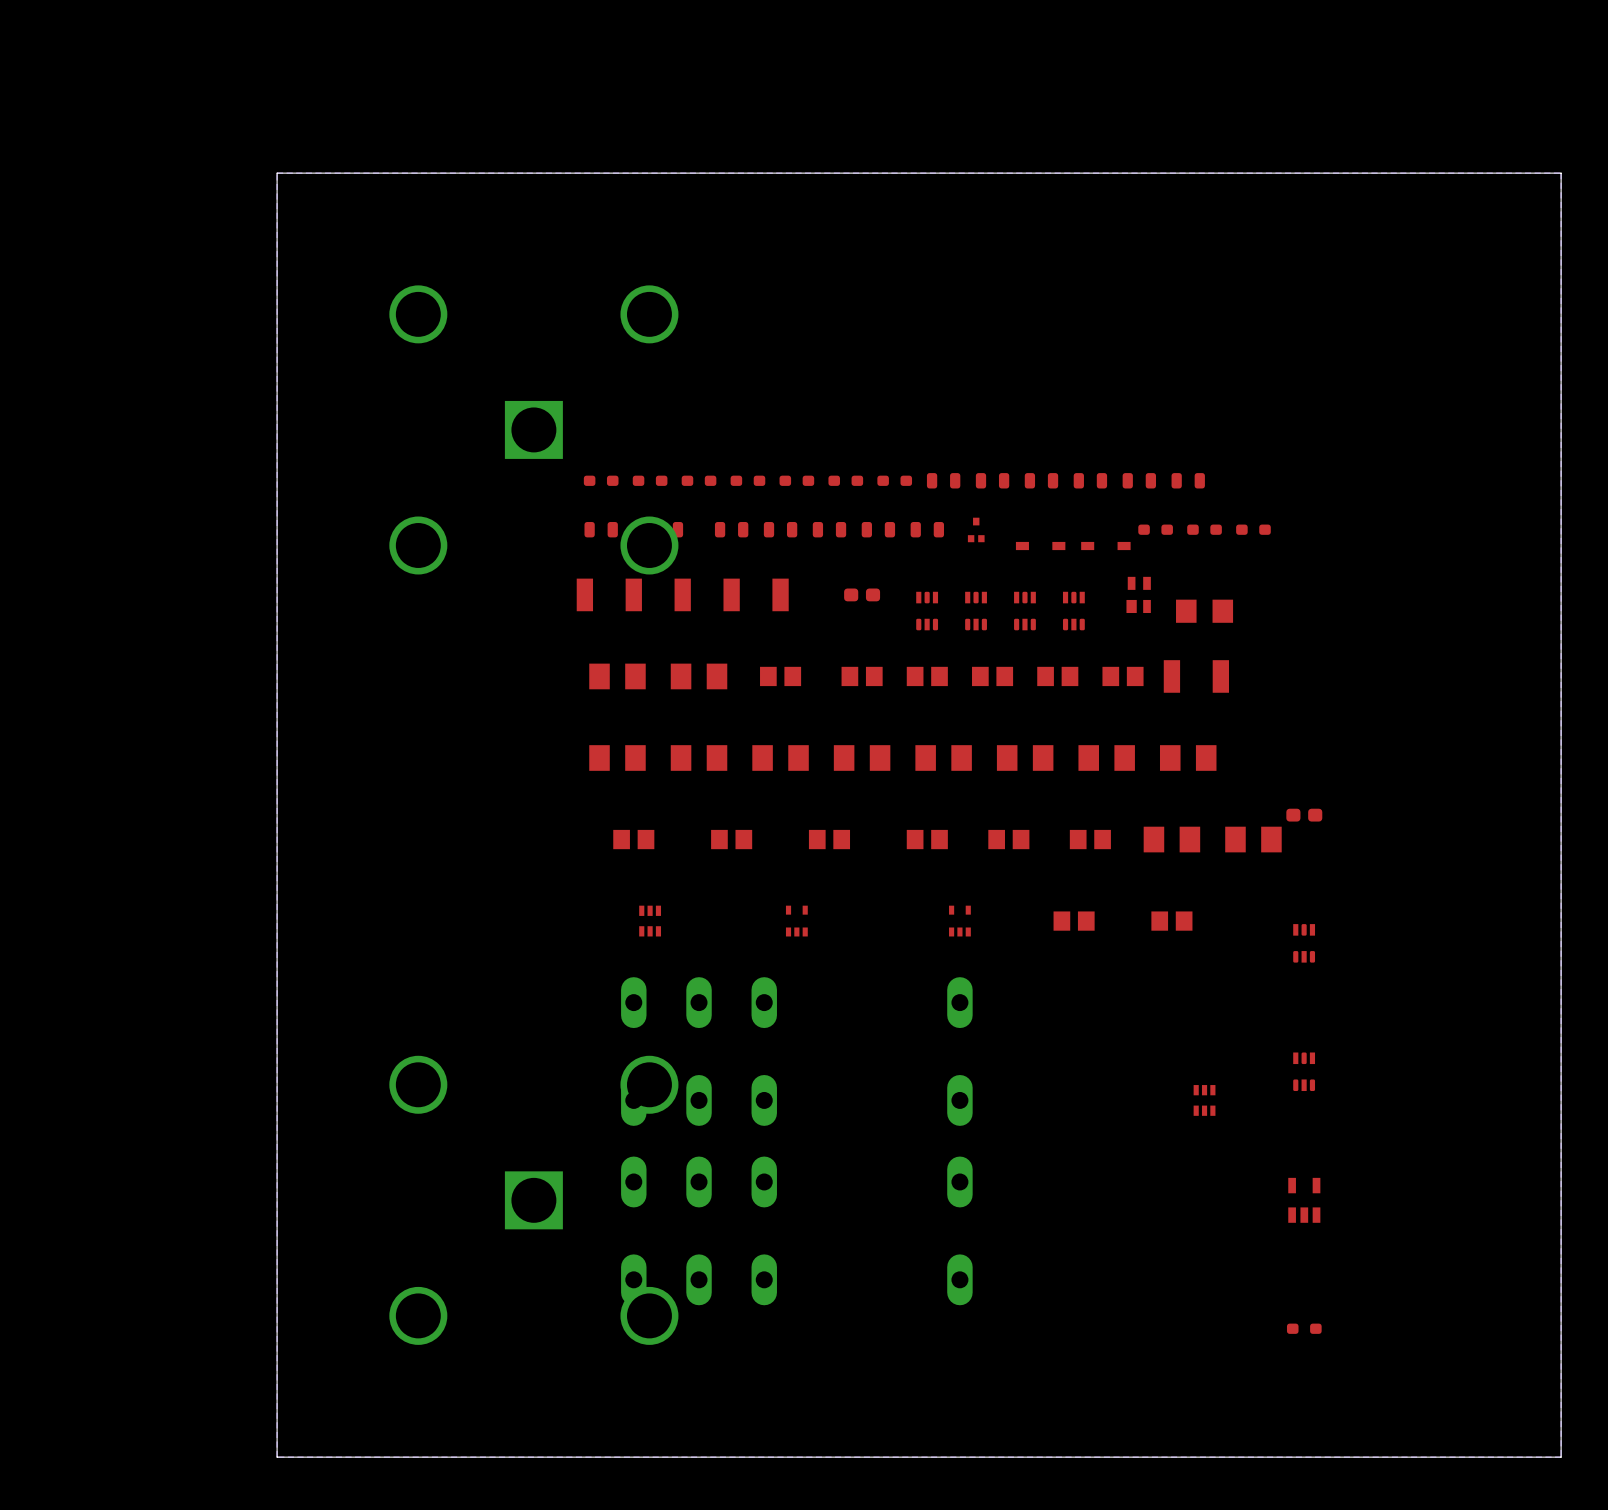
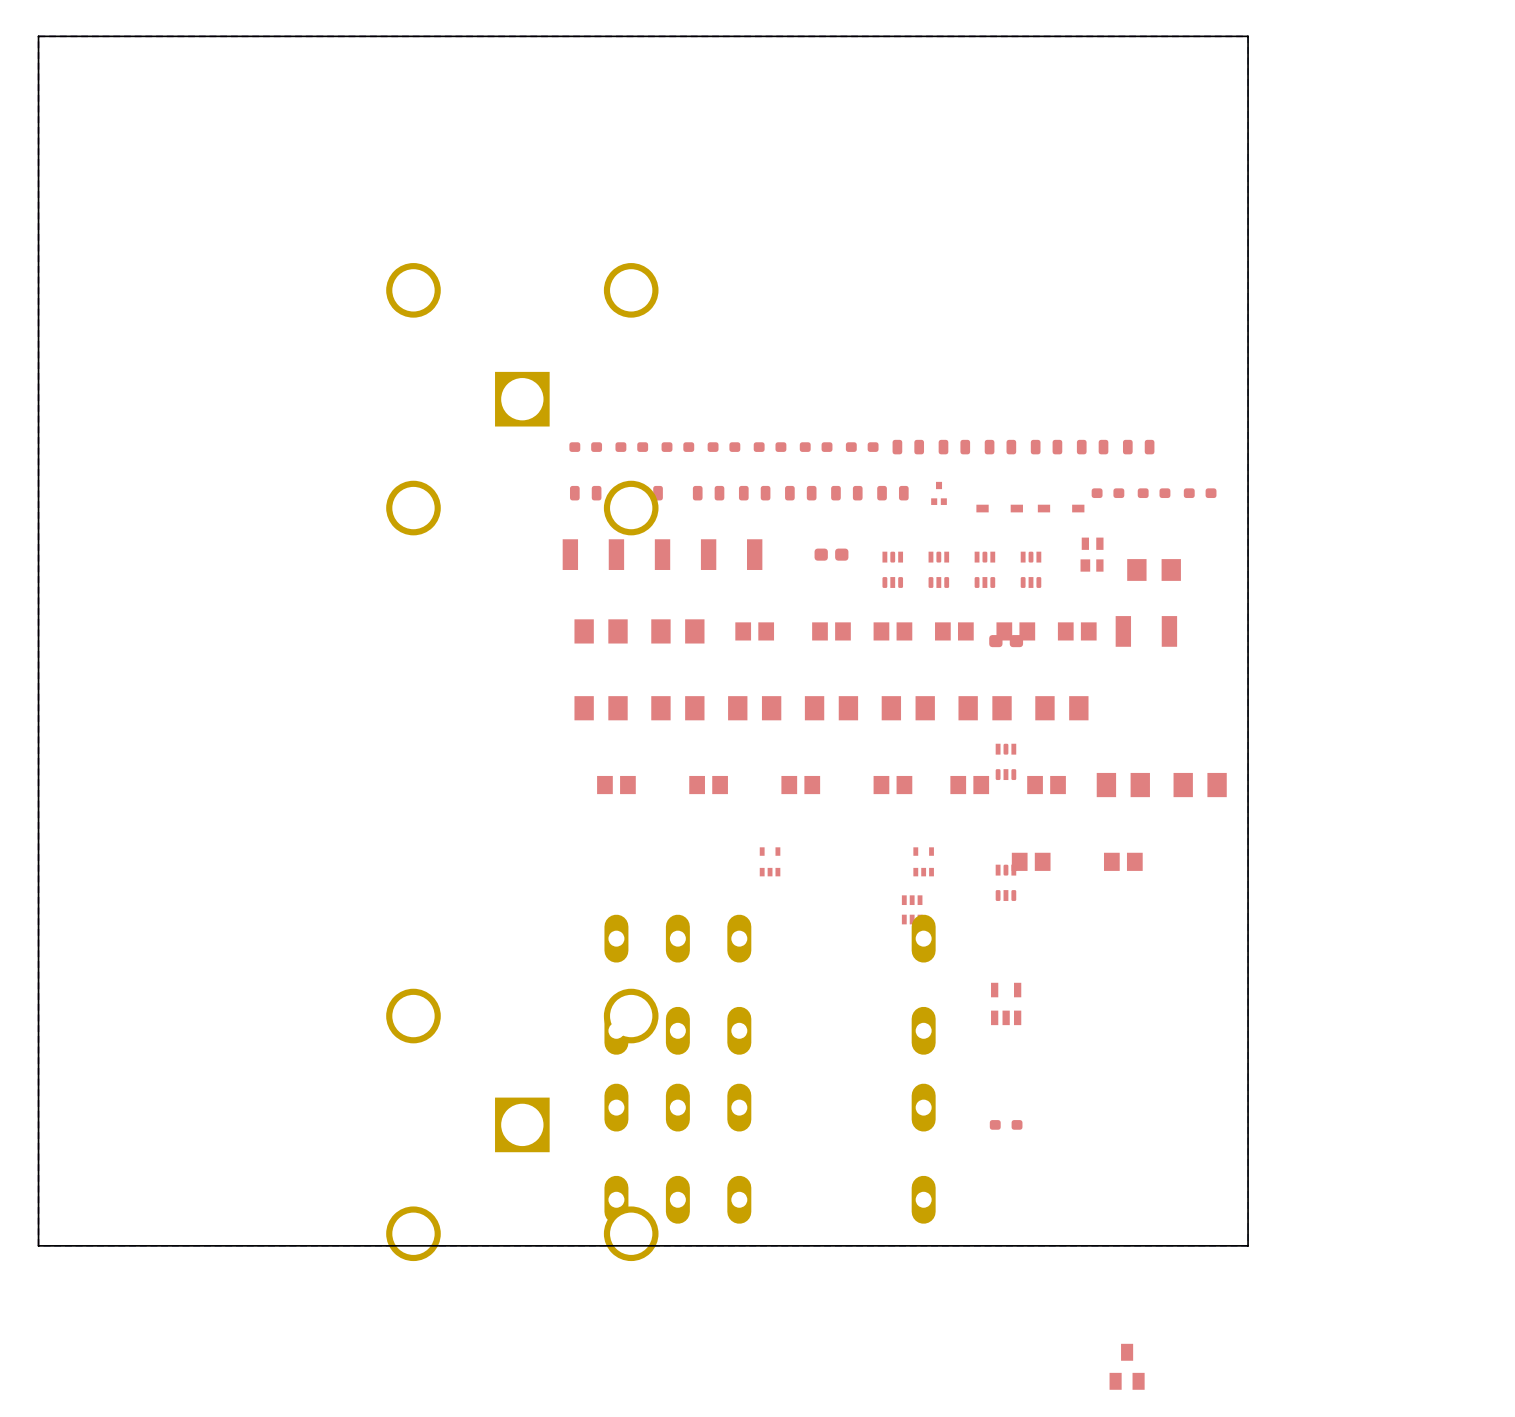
board edge: (1561, 173) (277, 173) (277, 1457) (1561, 1457) (1561, 173) -> (1248, 36) (38, 36) (38, 1245) (1248, 1245) (1248, 36)
part: (1188, 758) -> none
part: none -> (1005, 761)
part position: (1304, 815) -> (1006, 641)
part: (650, 921) -> none
part: none -> (1005, 882)
part: (1304, 943) -> none
part: none -> (912, 909)
part: (1304, 1071) -> none
part: (1204, 1100) -> none
part position: (1304, 1200) -> (1006, 1003)
part position: (1304, 1328) -> (1006, 1124)
part: none -> (1127, 1366)

